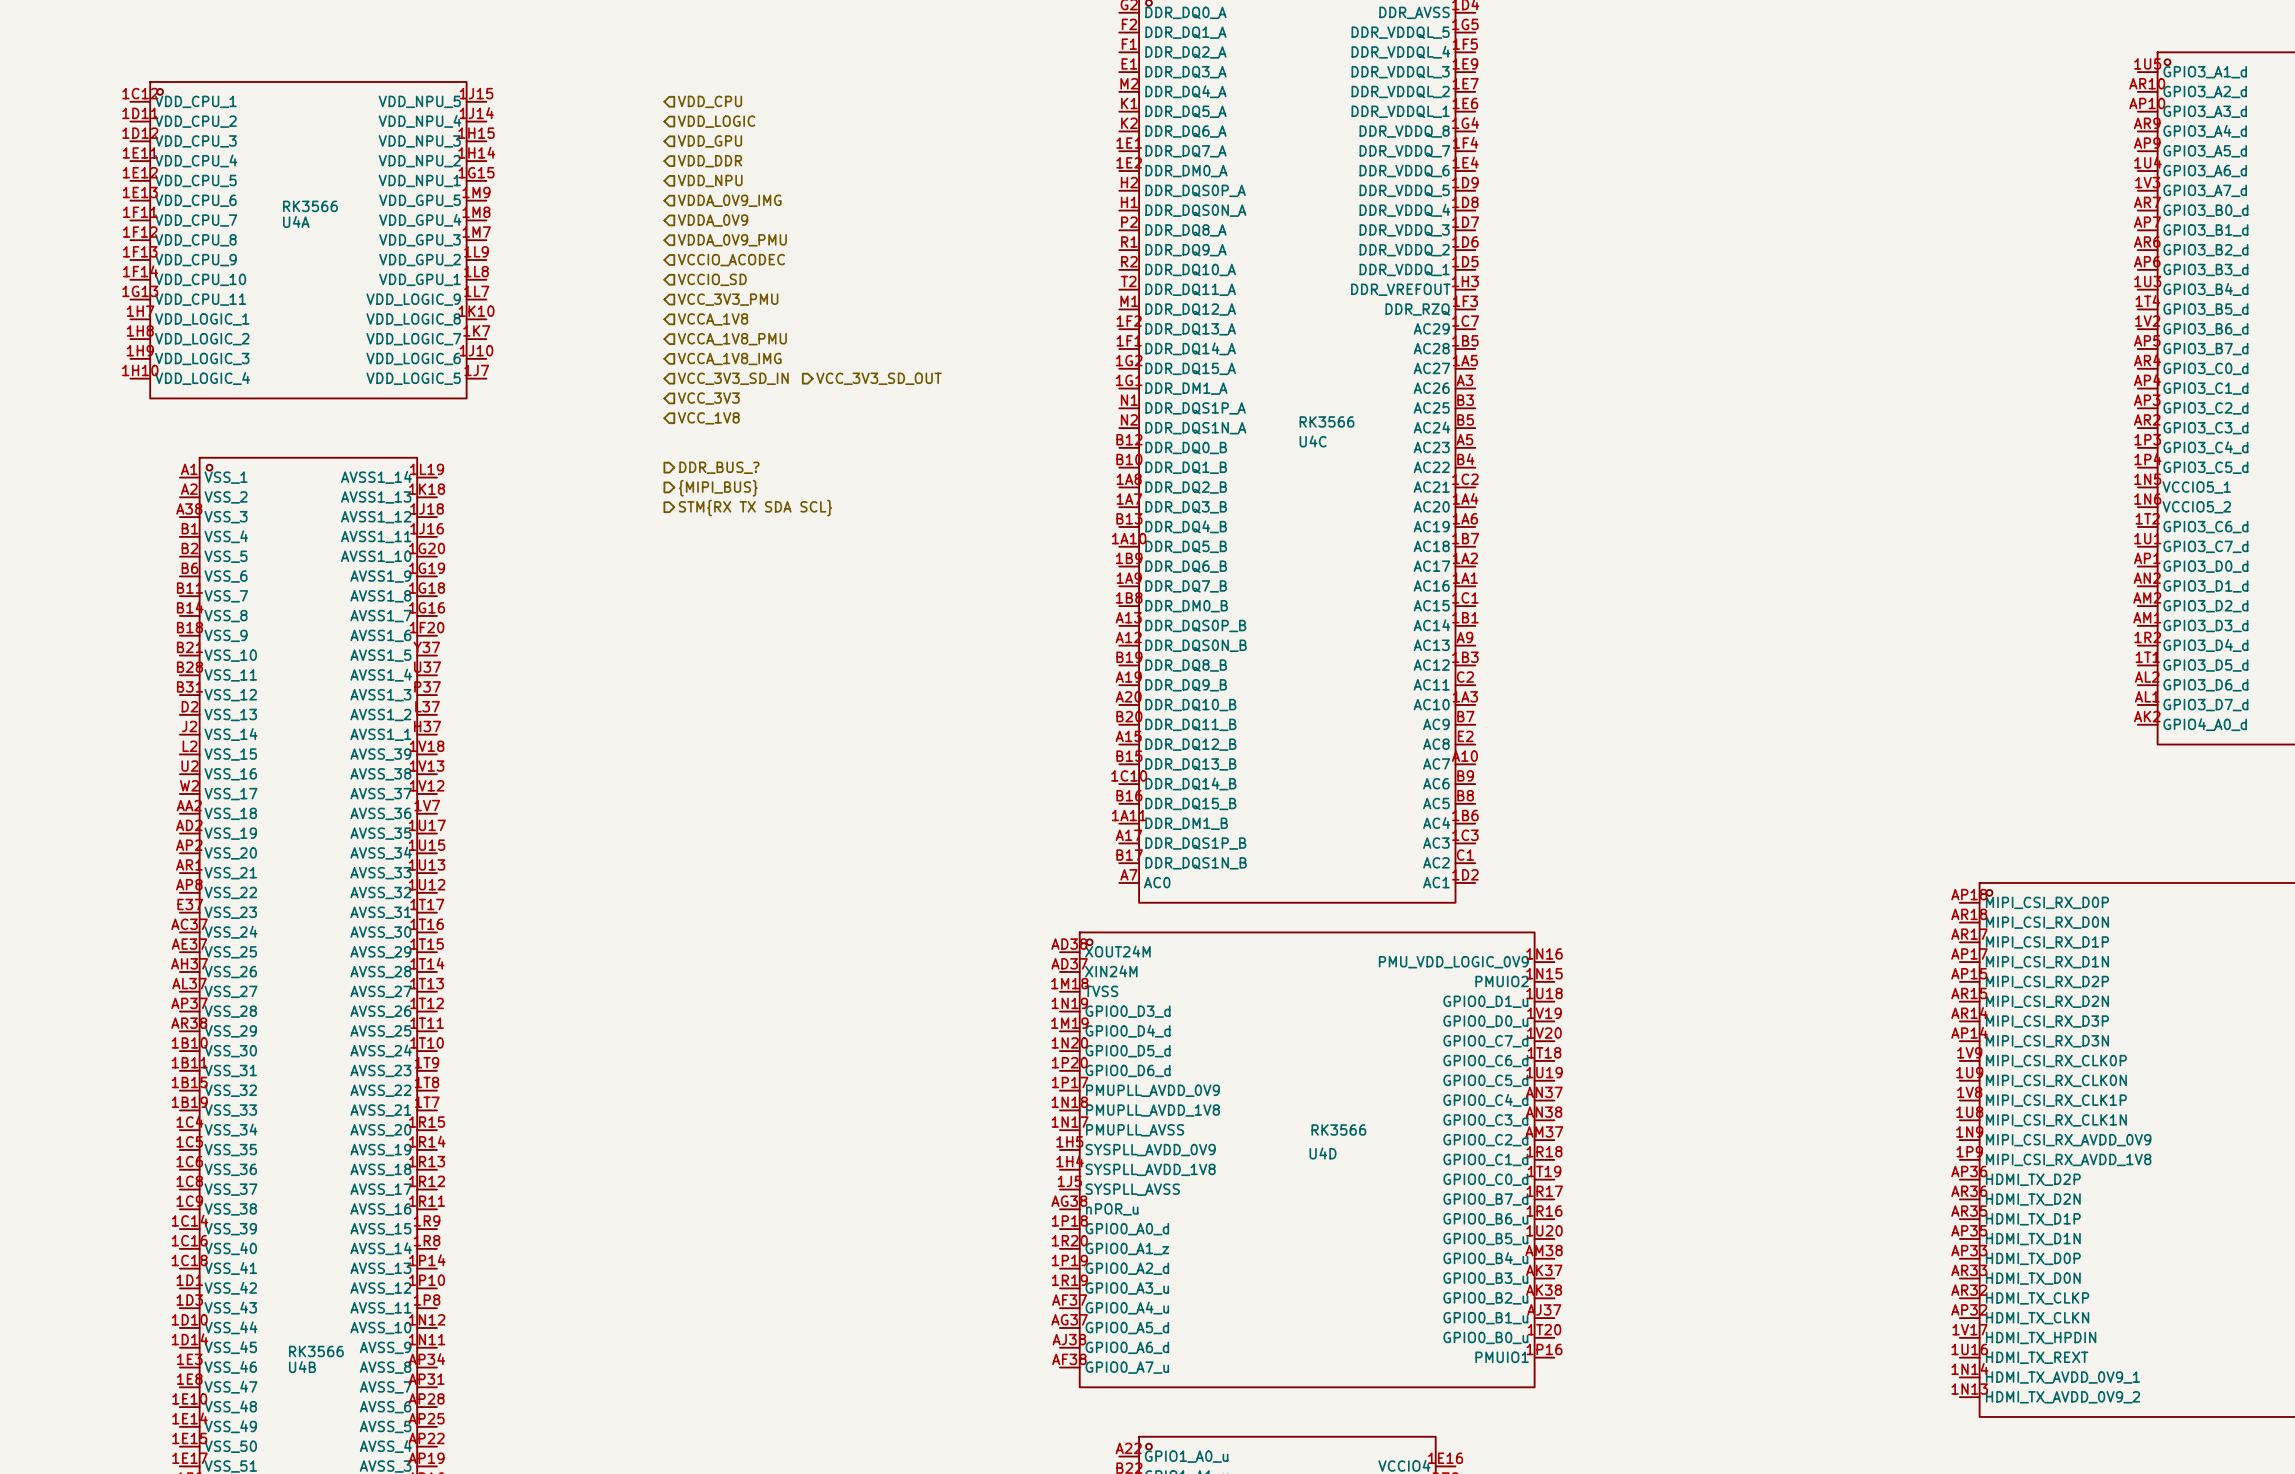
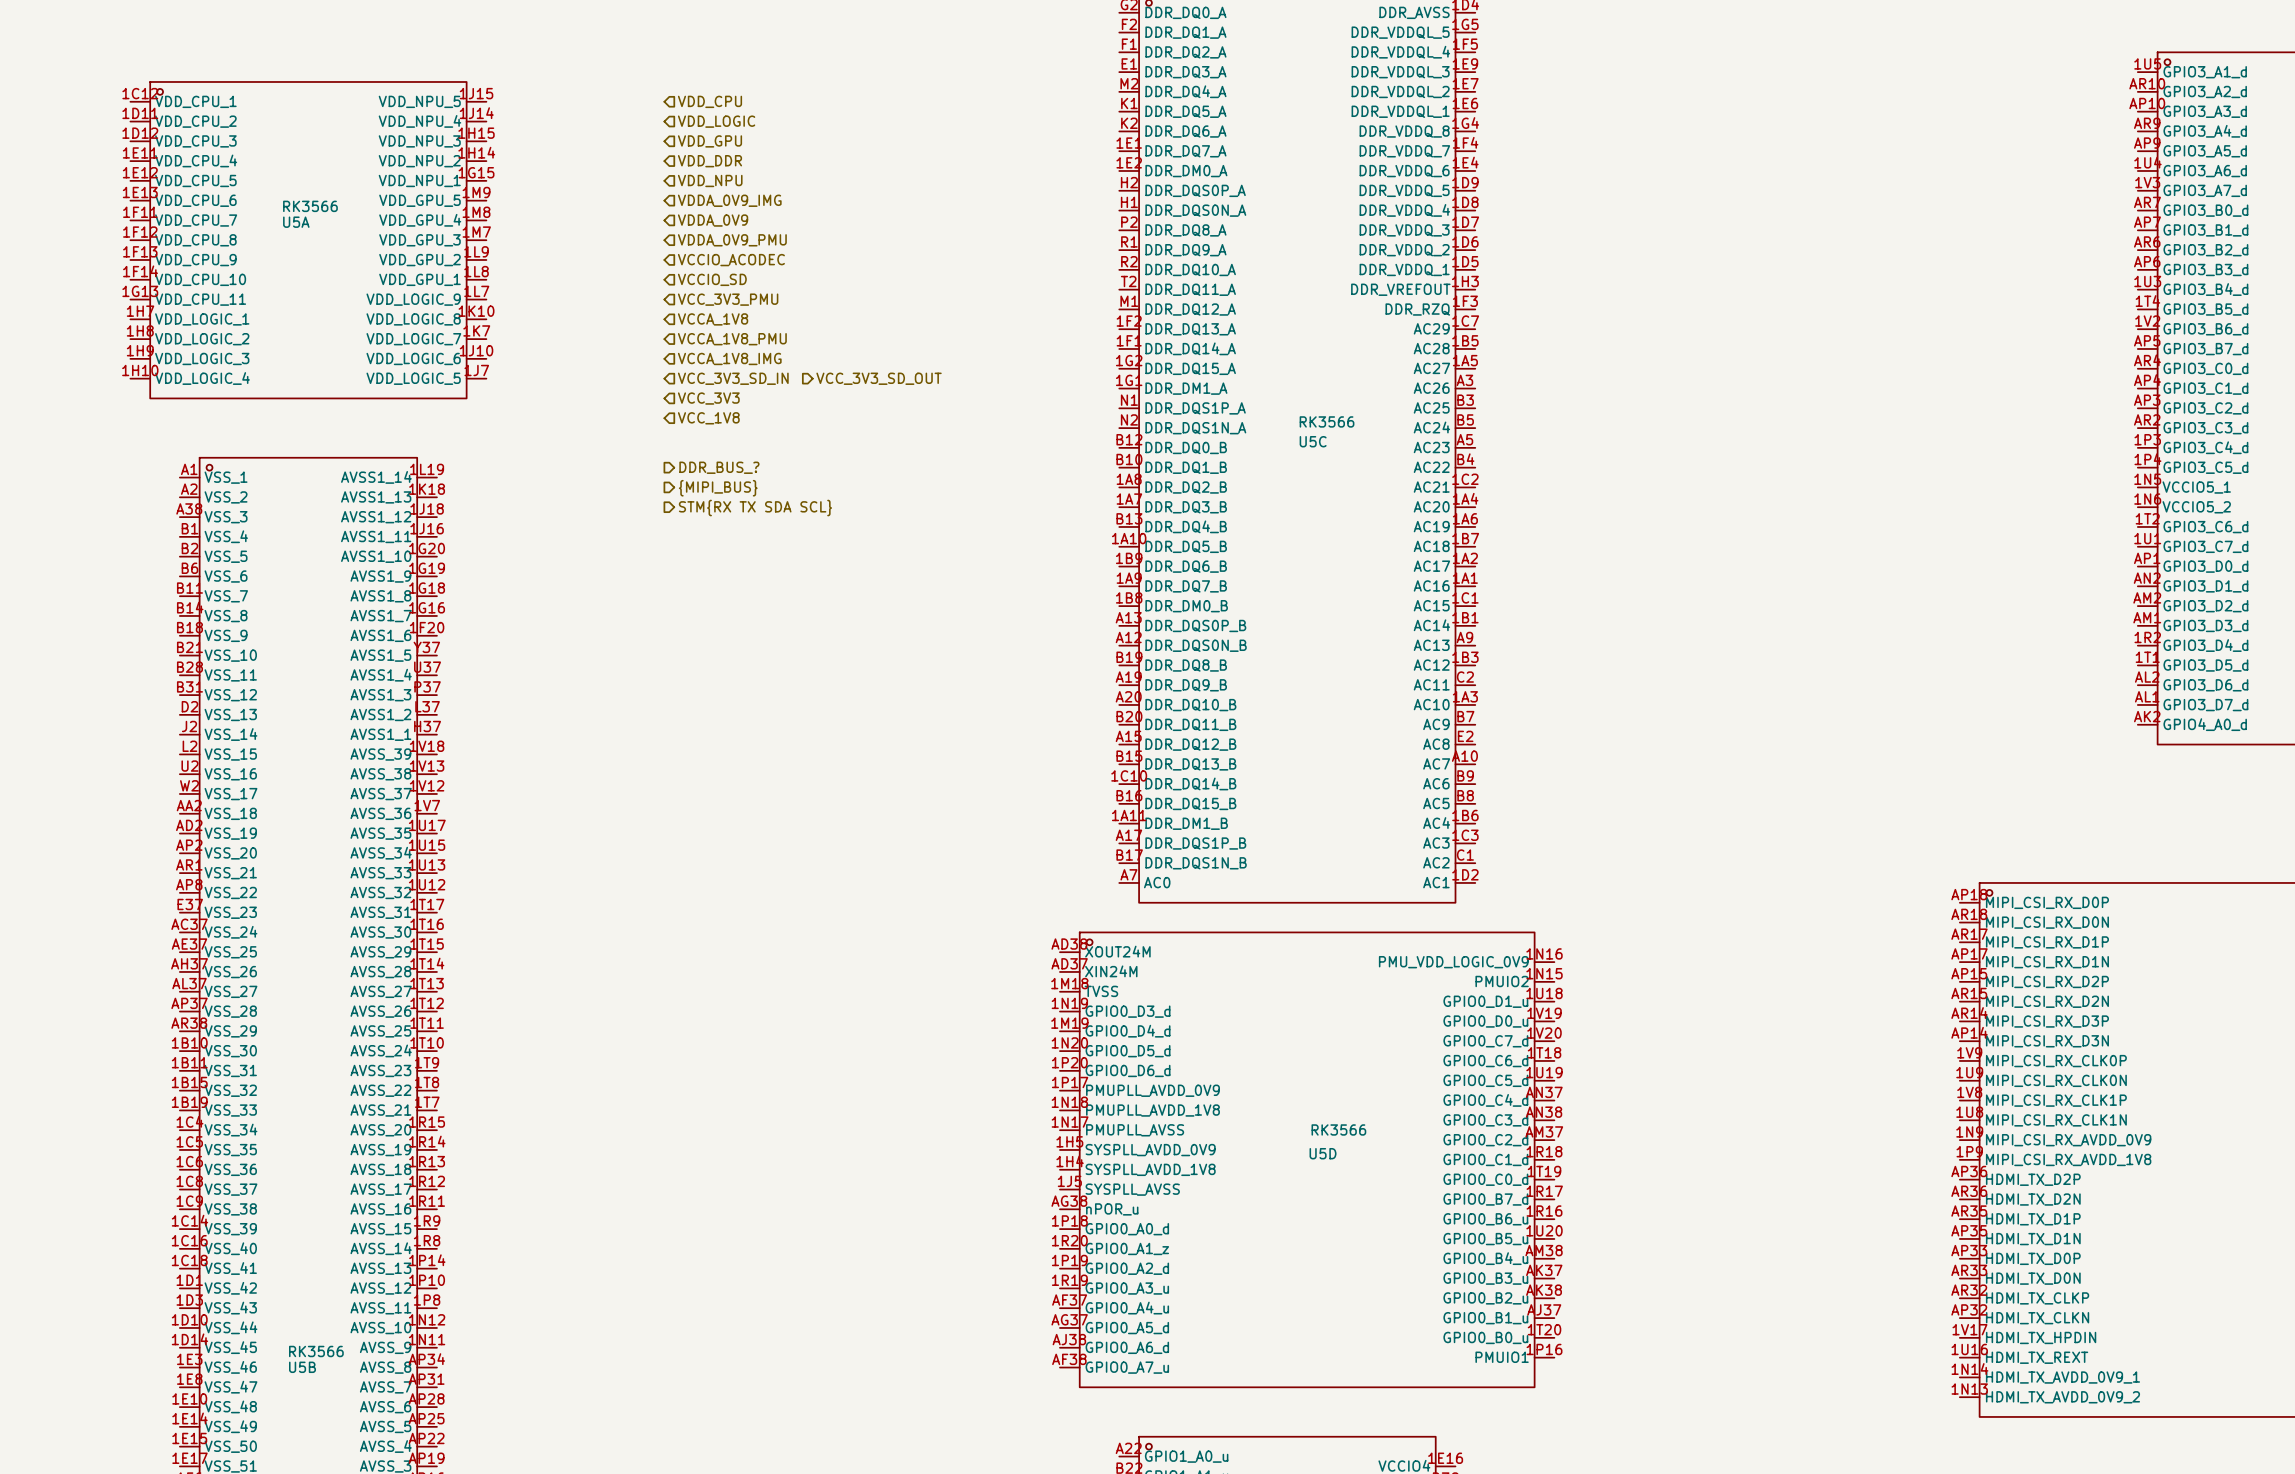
U4A name: U4A (296, 221) -> U5A (296, 222)
U4C name: U4C (1313, 441) -> U5C (1313, 441)
U4D name: U4D (1323, 1153) -> U5D (1323, 1153)
U4B name: U4B (302, 1367) -> U5B (302, 1367)

